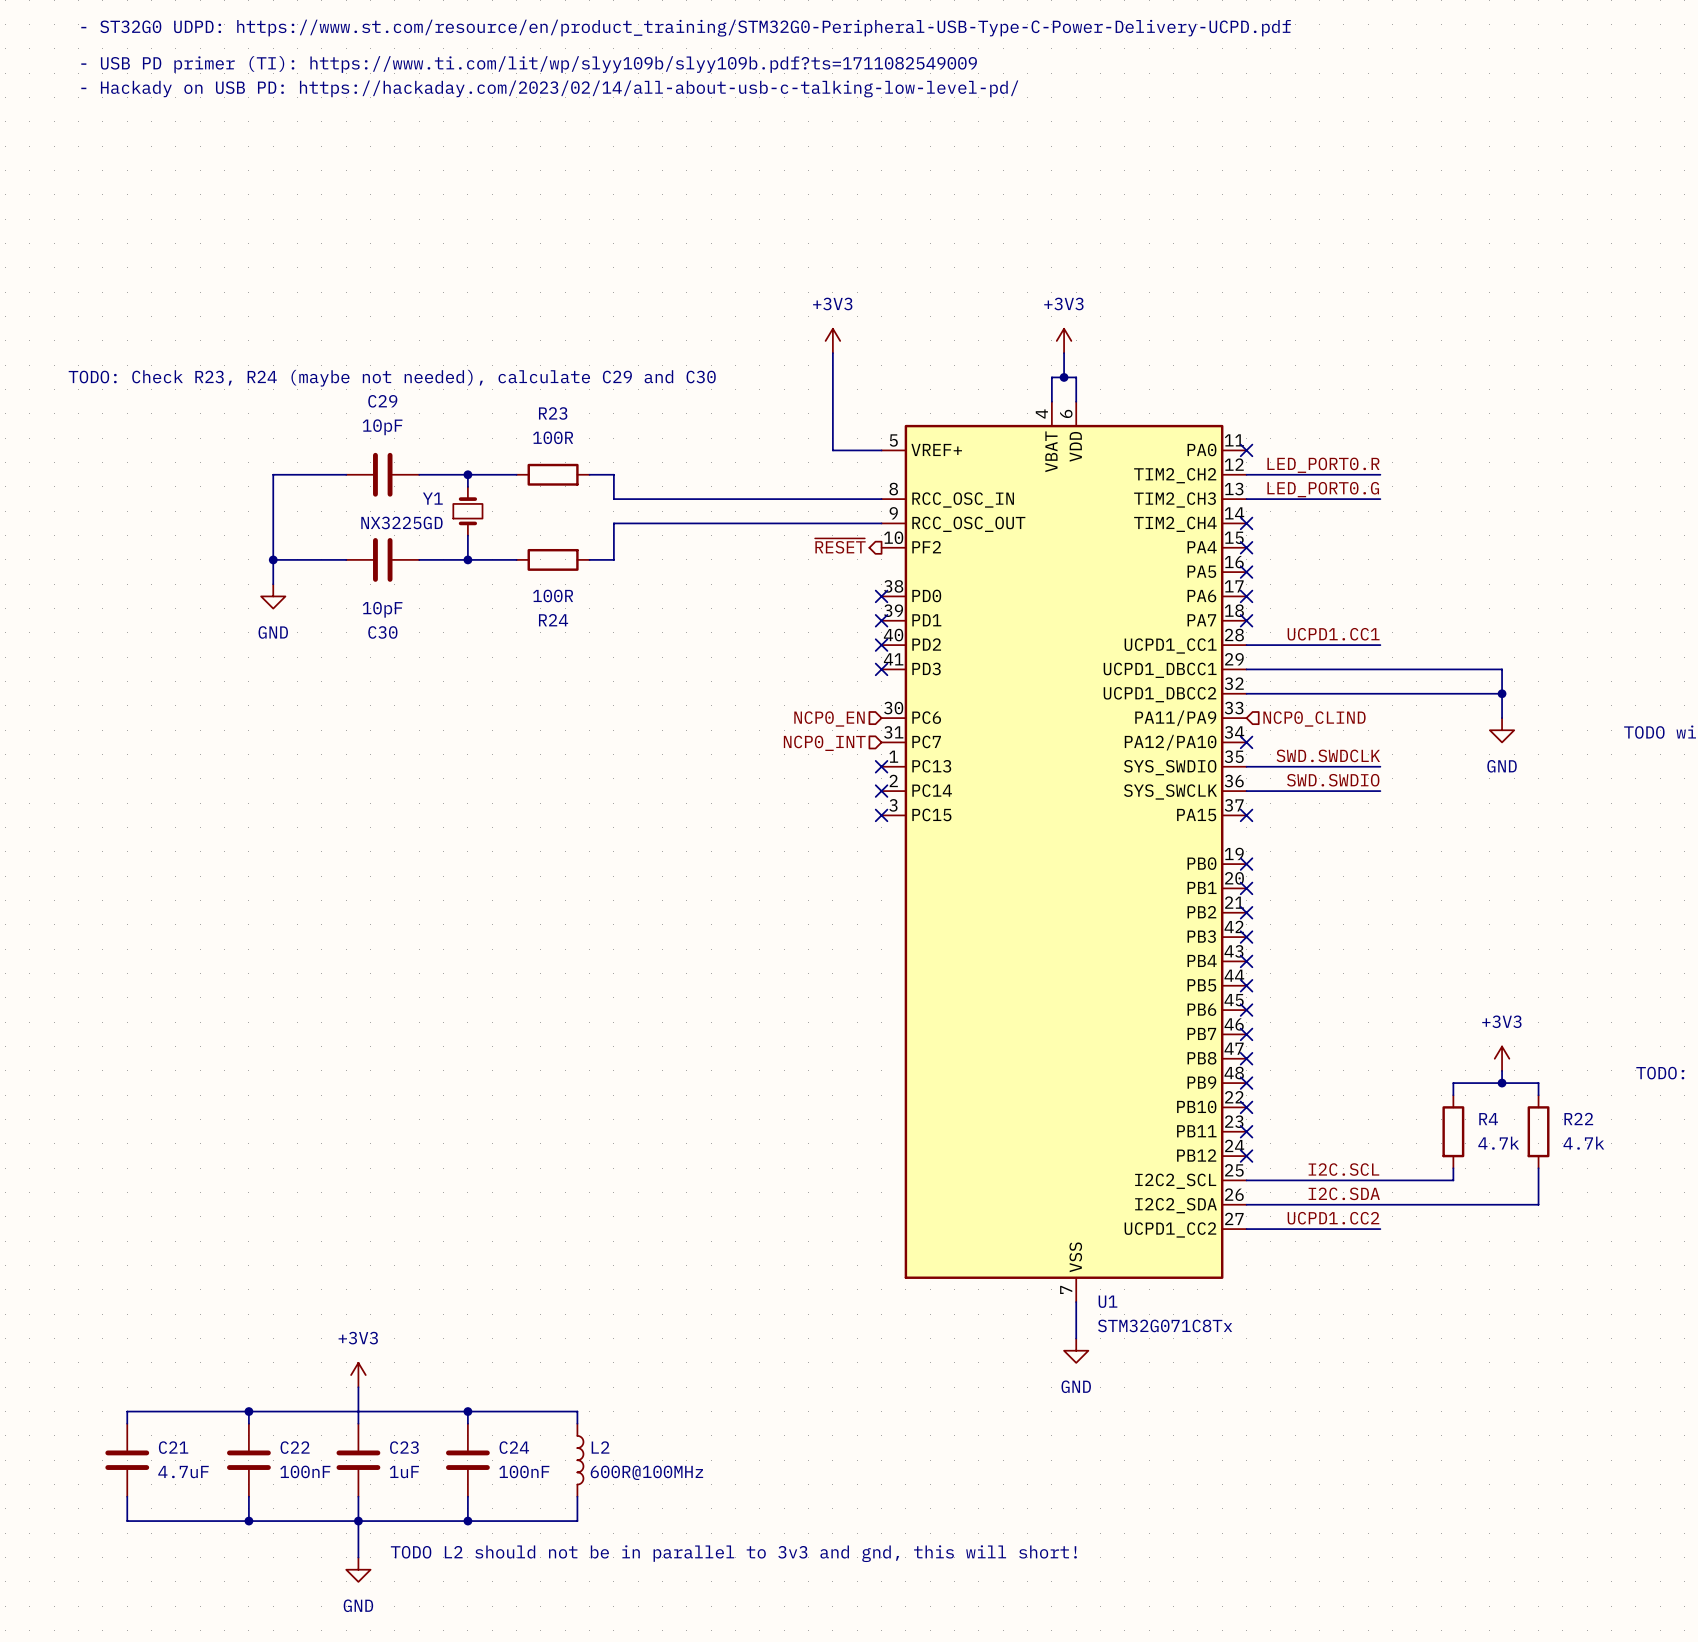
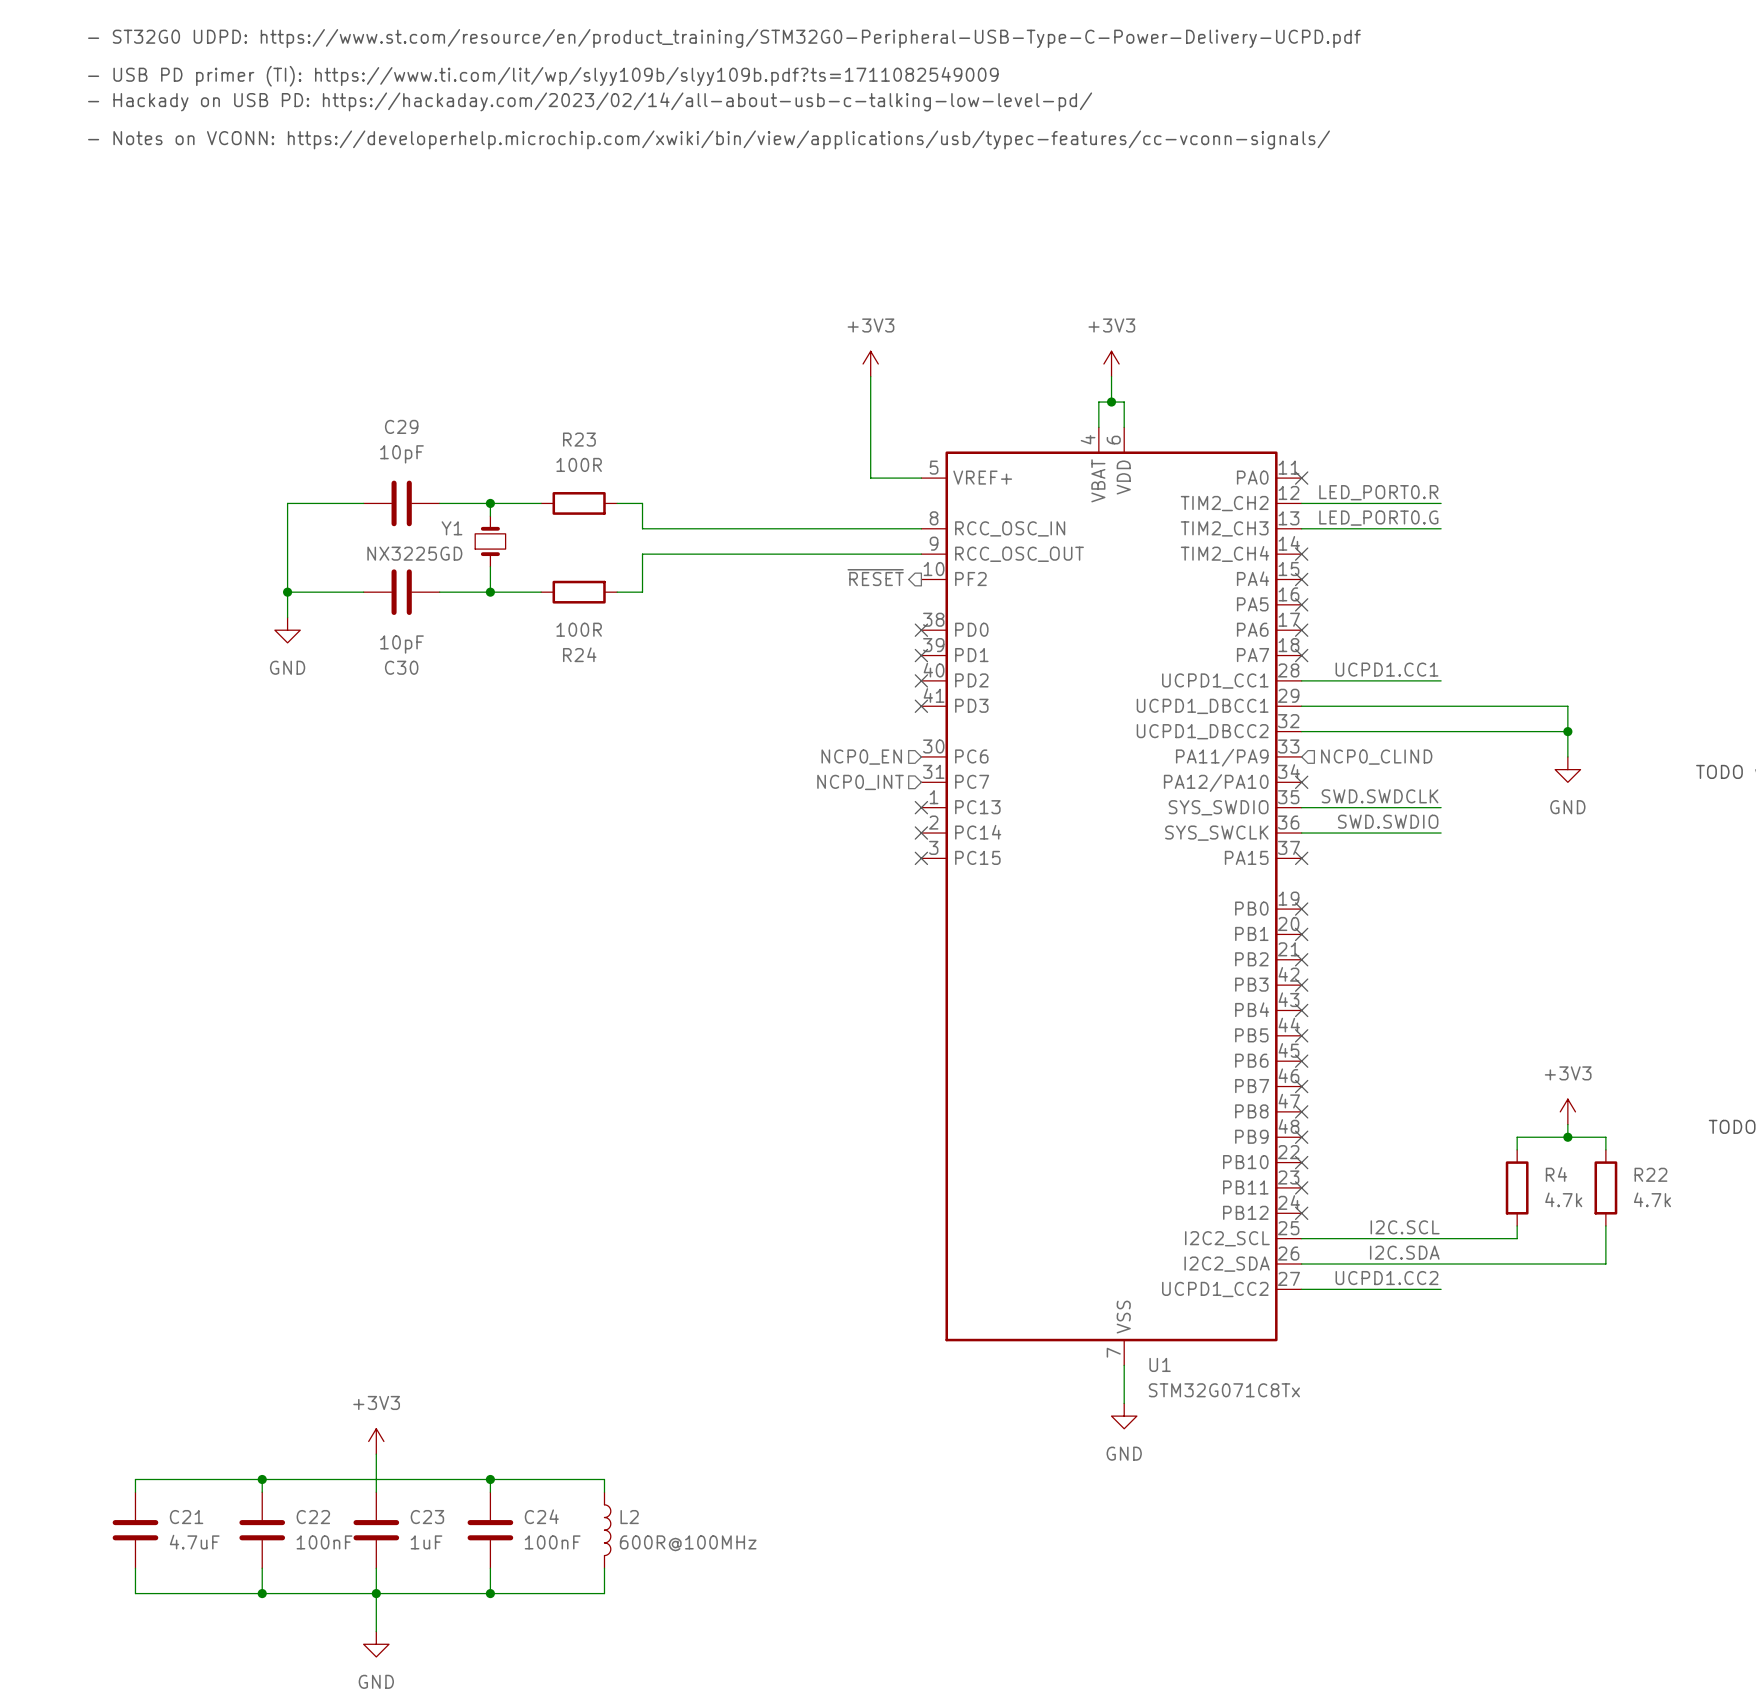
text: none -> - Notes on VCONN: https://developerhelp.microchip.com/xwiki/bin/view/applications/usb/typec-features/cc-vconn-signals/ (709, 139)
text: TODO: Check R23, R24 (maybe not needed), calculate C29 and C30 (392, 378) -> none
text: TODO L2 should not be in parallel to 3v3 and gnd, this will short! (733, 1553) -> none

